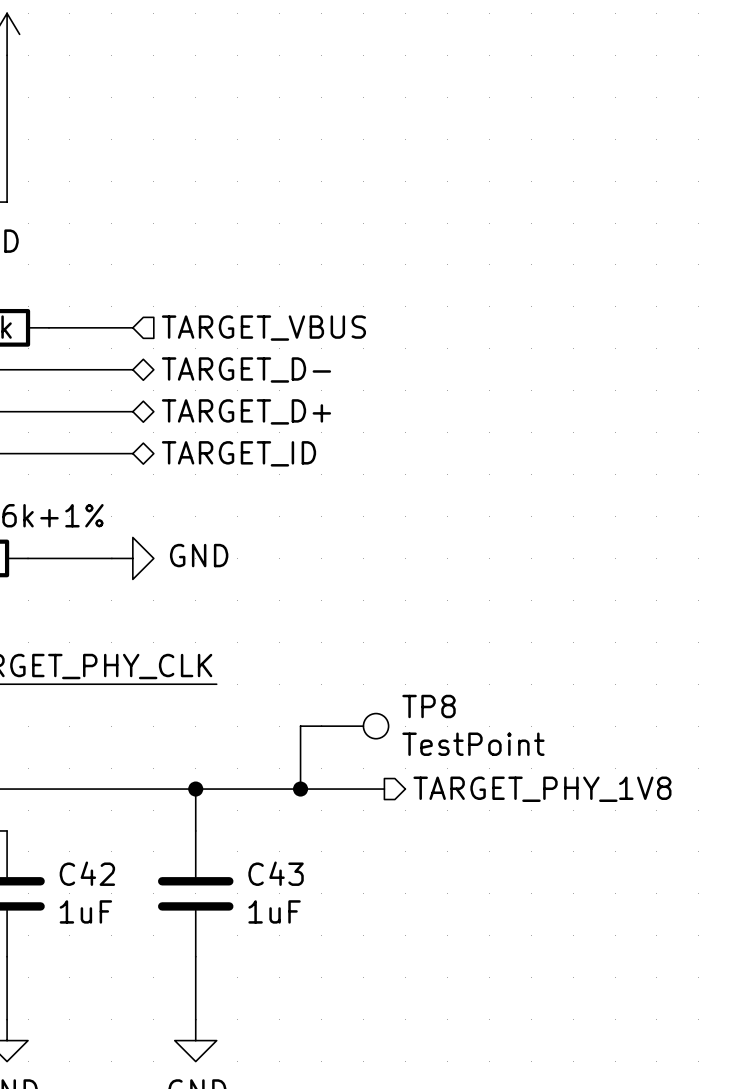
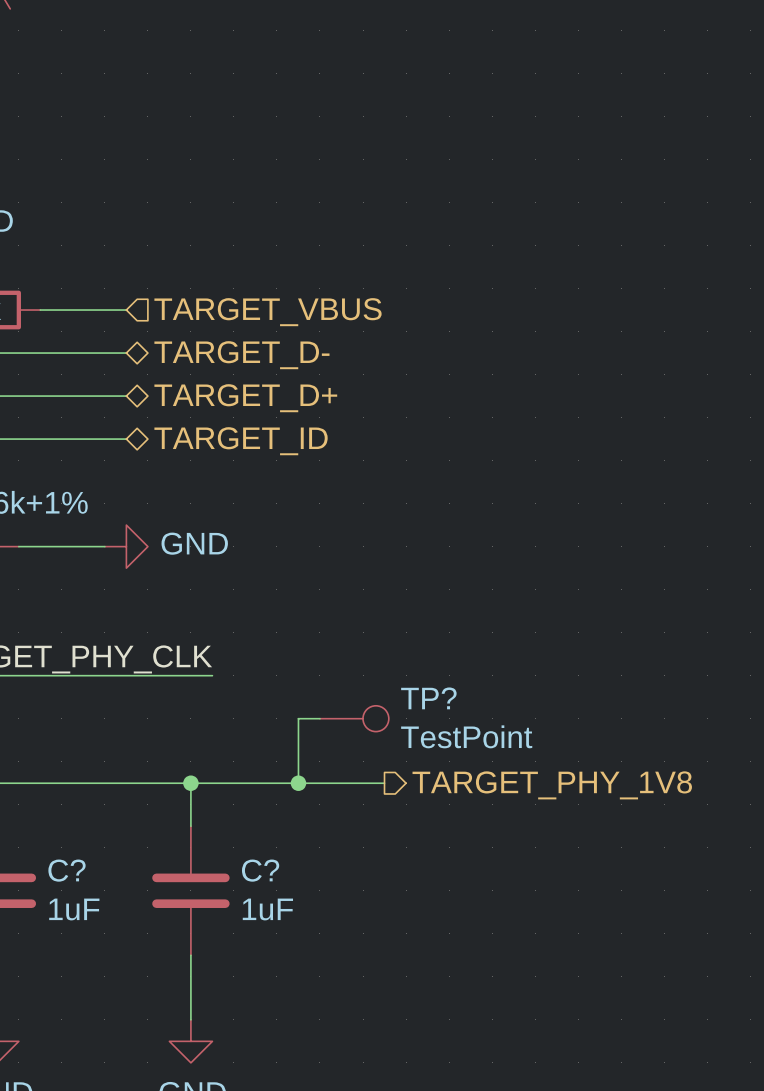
TP8 name: TP8 (429, 706) -> TP? (428, 698)
C42 name: C42 (87, 873) -> C? (67, 870)
C43 name: C43 (276, 873) -> C? (260, 870)

